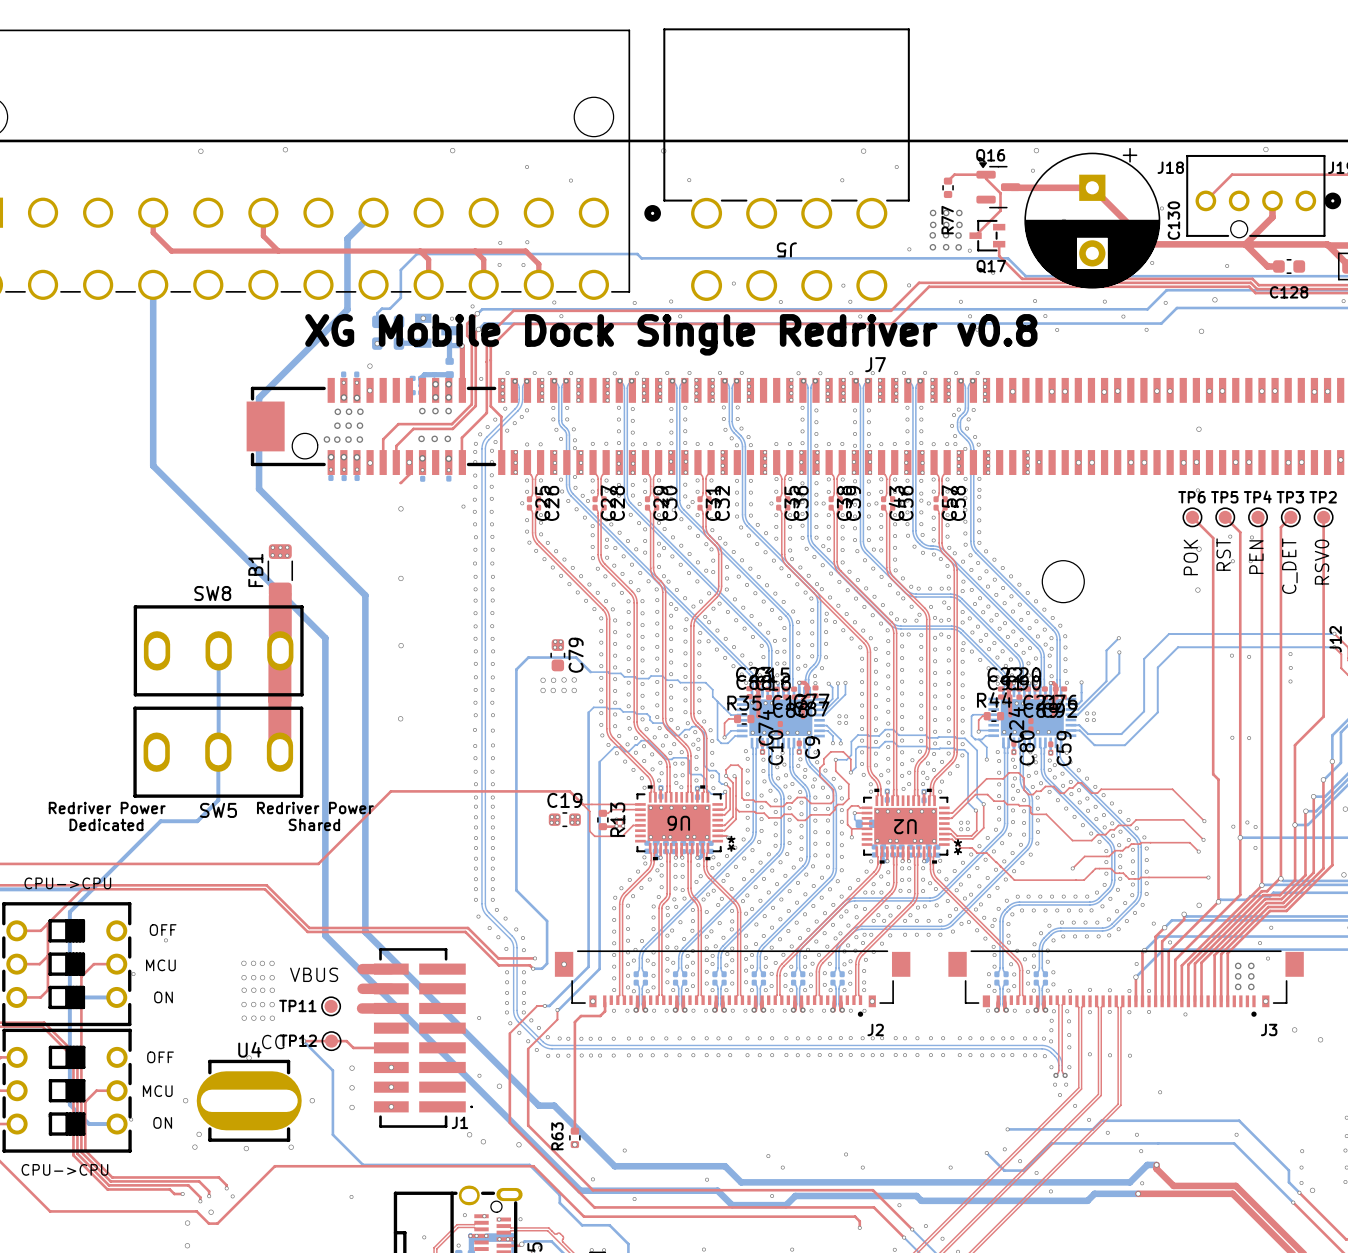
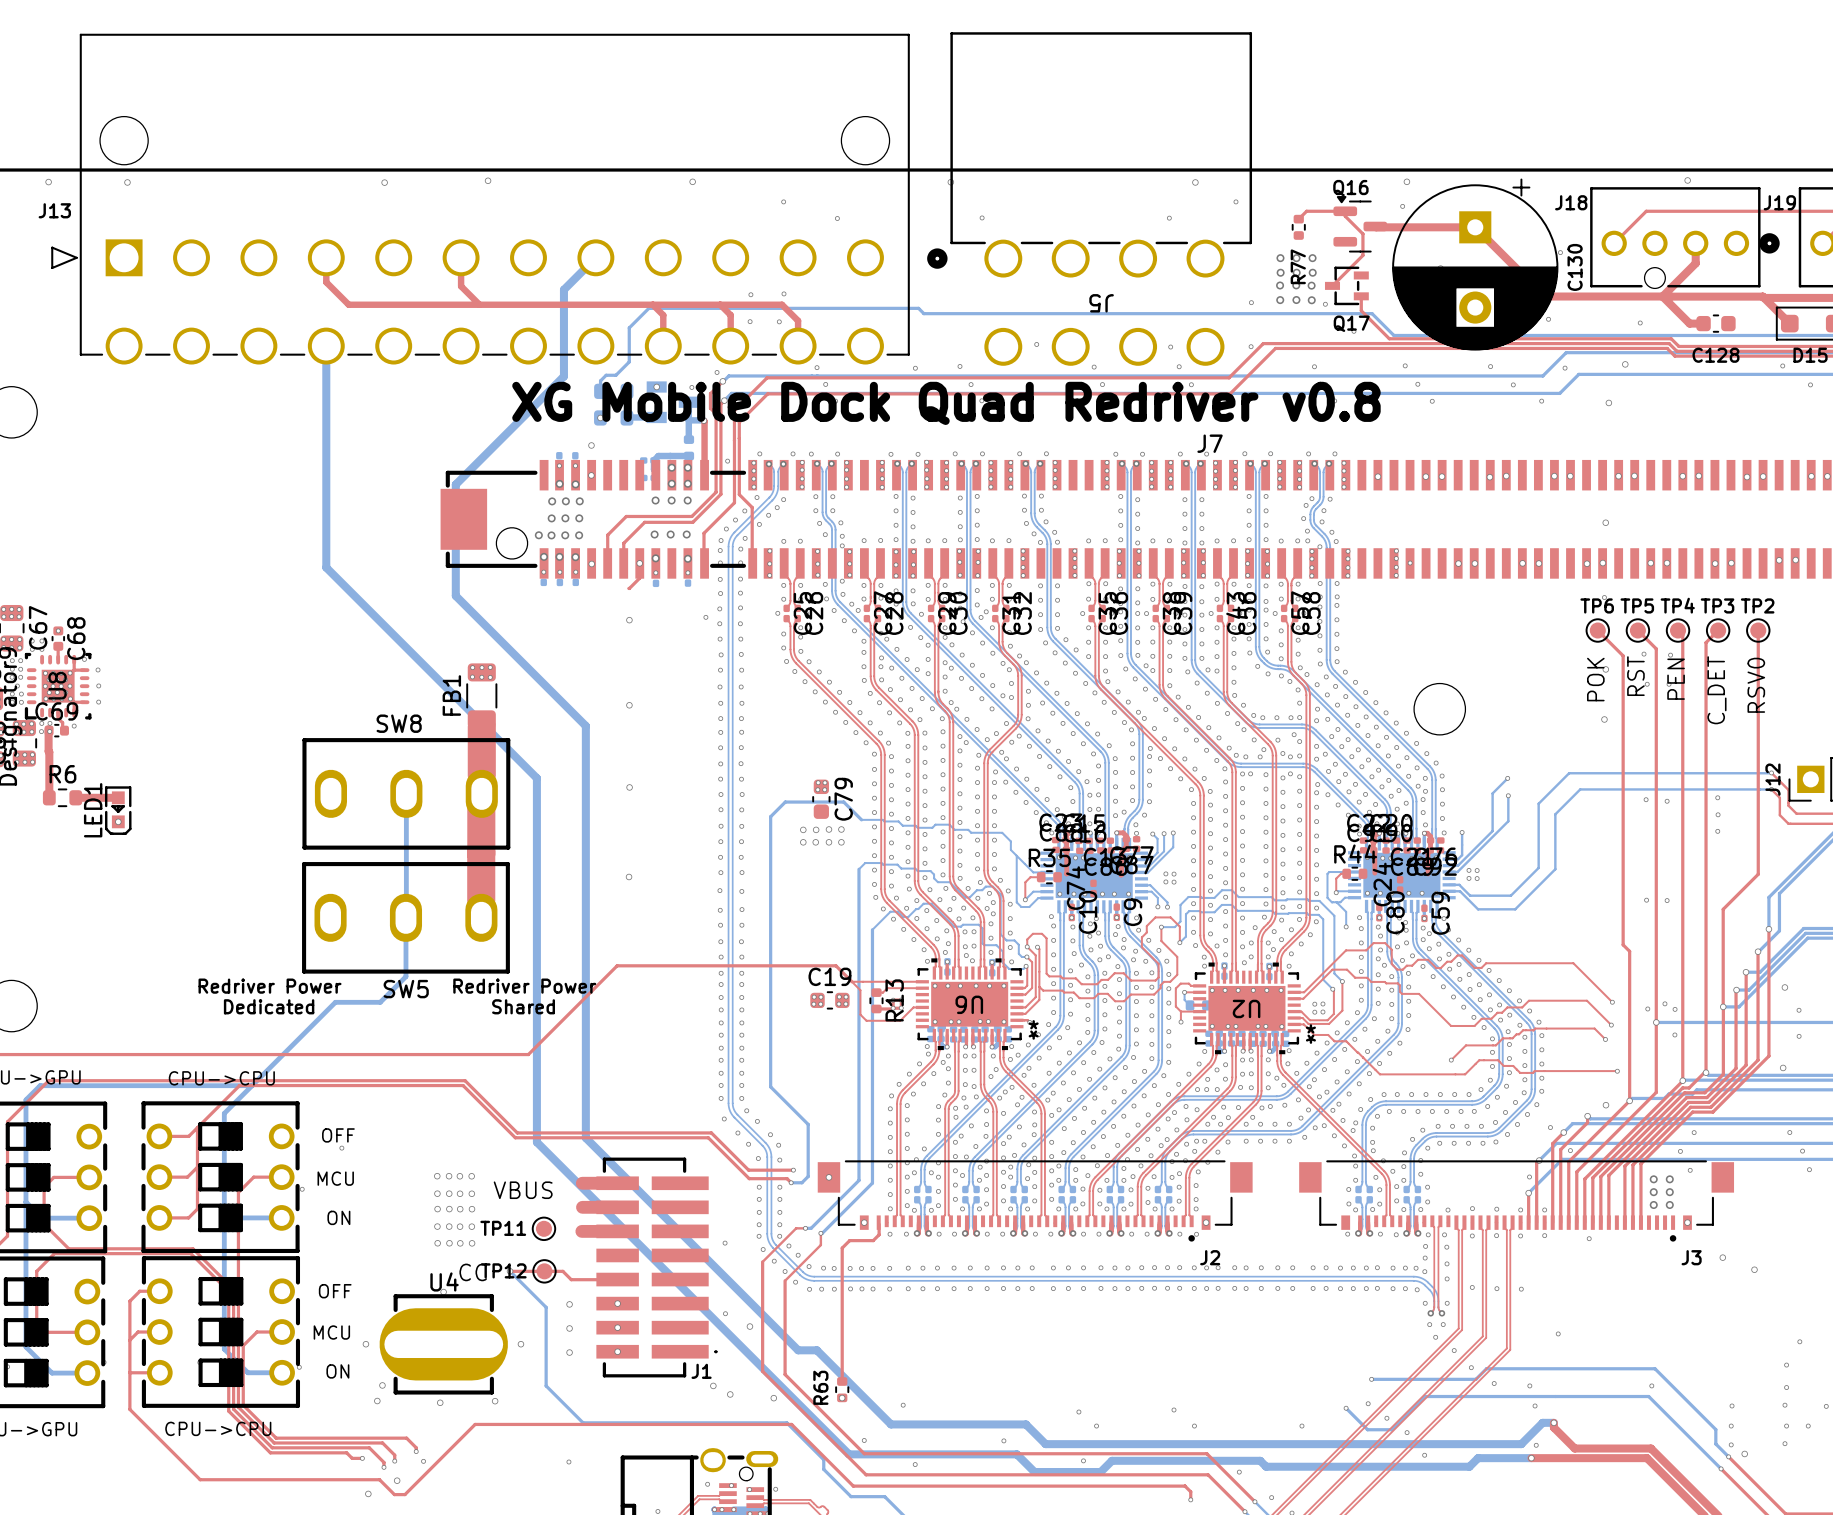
text: XG Mobile Dock Single Redriver v0.8 (671, 334) -> XG Mobile Dock Quad Redriver v0.8 (946, 403)

